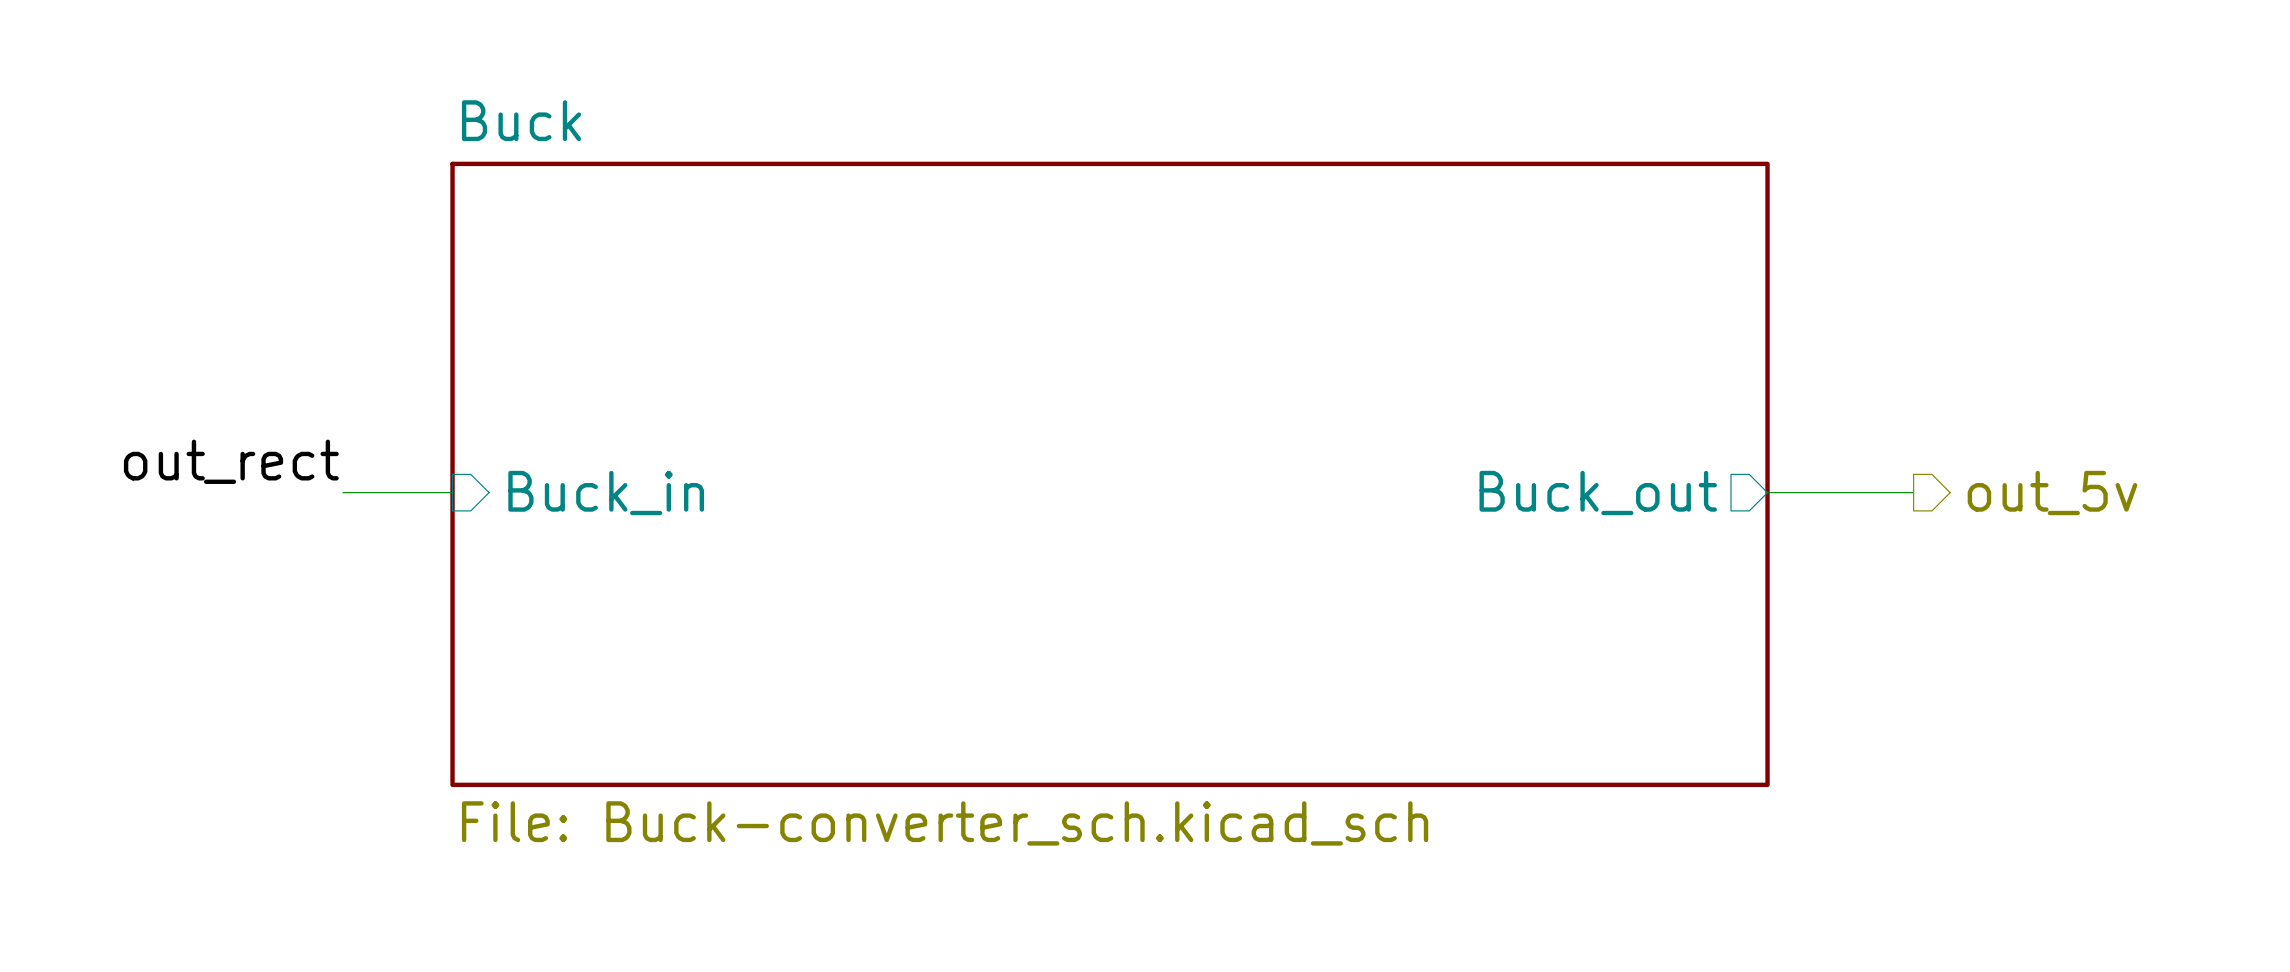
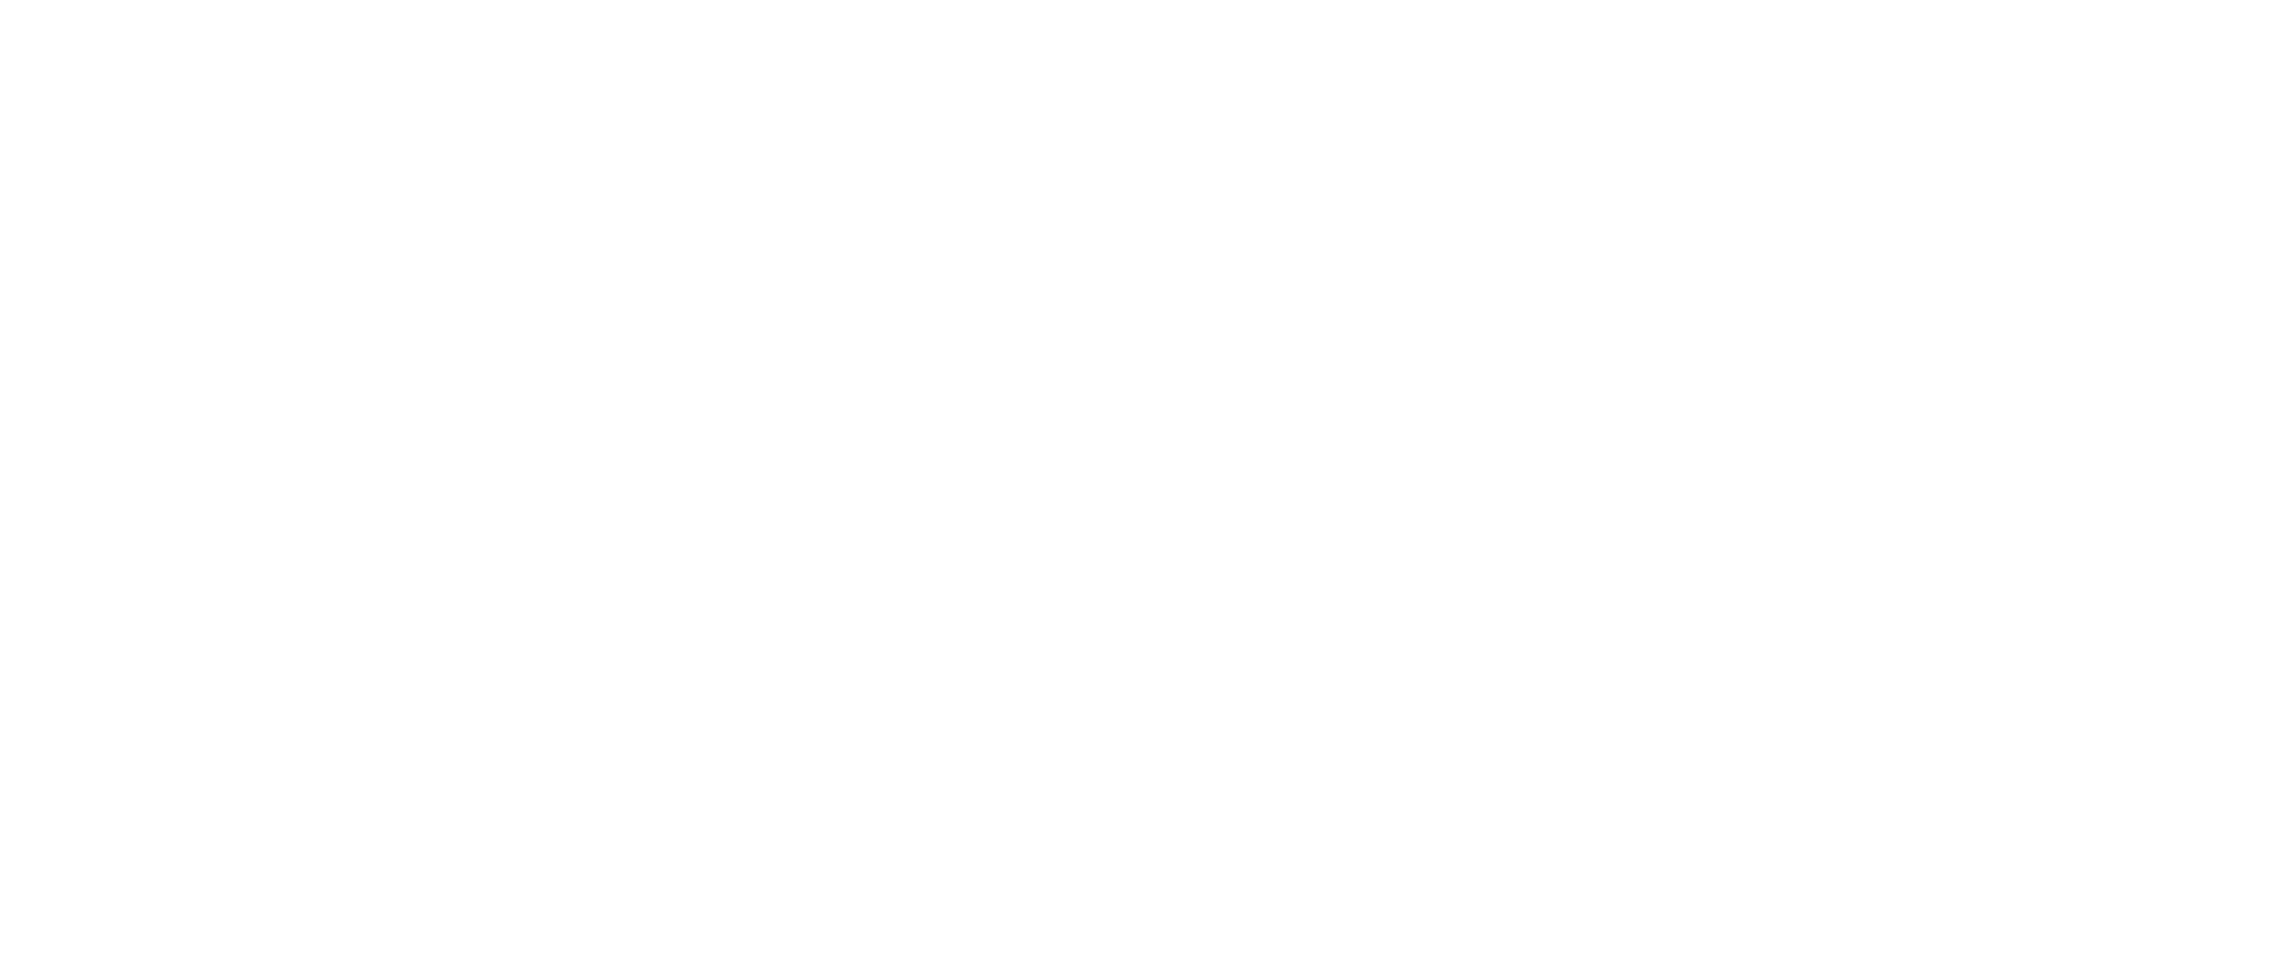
label: out_rect (231, 461) -> none
sheet Buck: File: Buck-converter_sch.kicad_sch (1110, 474) -> none
wire: (342, 492) (452, 492) -> none
wire: (1767, 492) (1913, 492) -> none
sheet pin: Buck_in (606, 493) -> none
sheet pin: Buck_out (1598, 493) -> none
hierarchical label: out_5v (2052, 493) -> none

